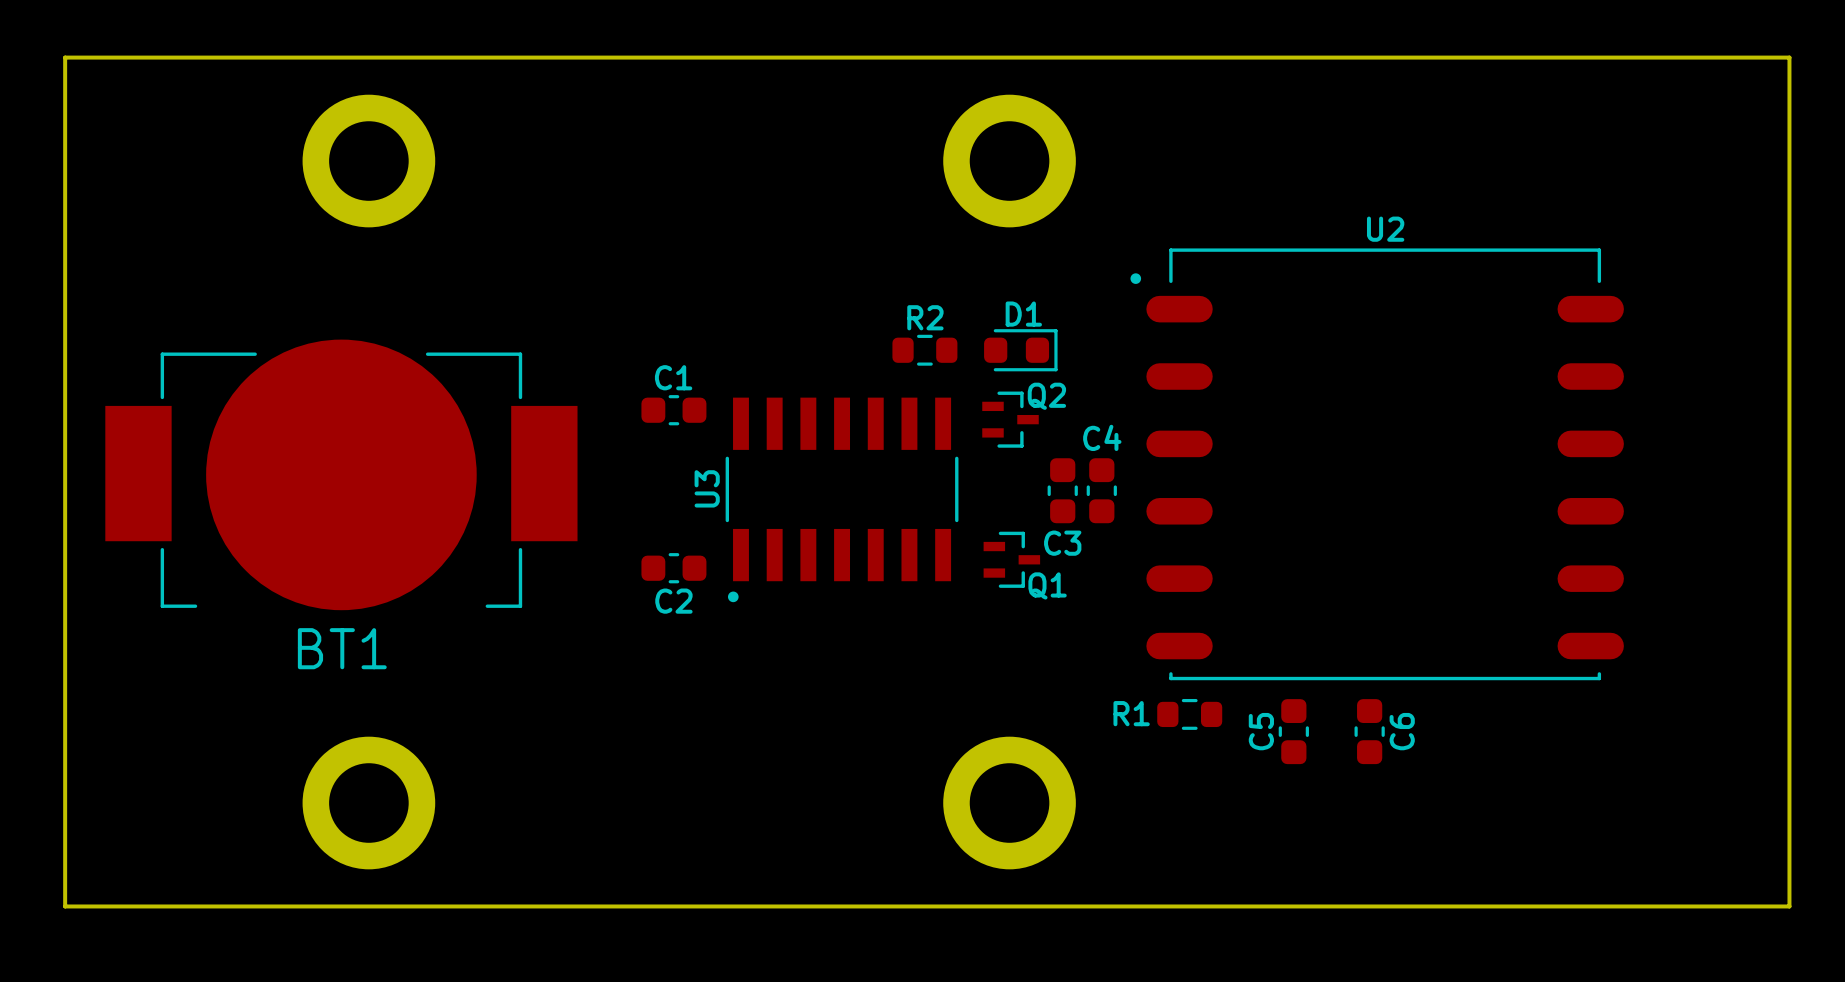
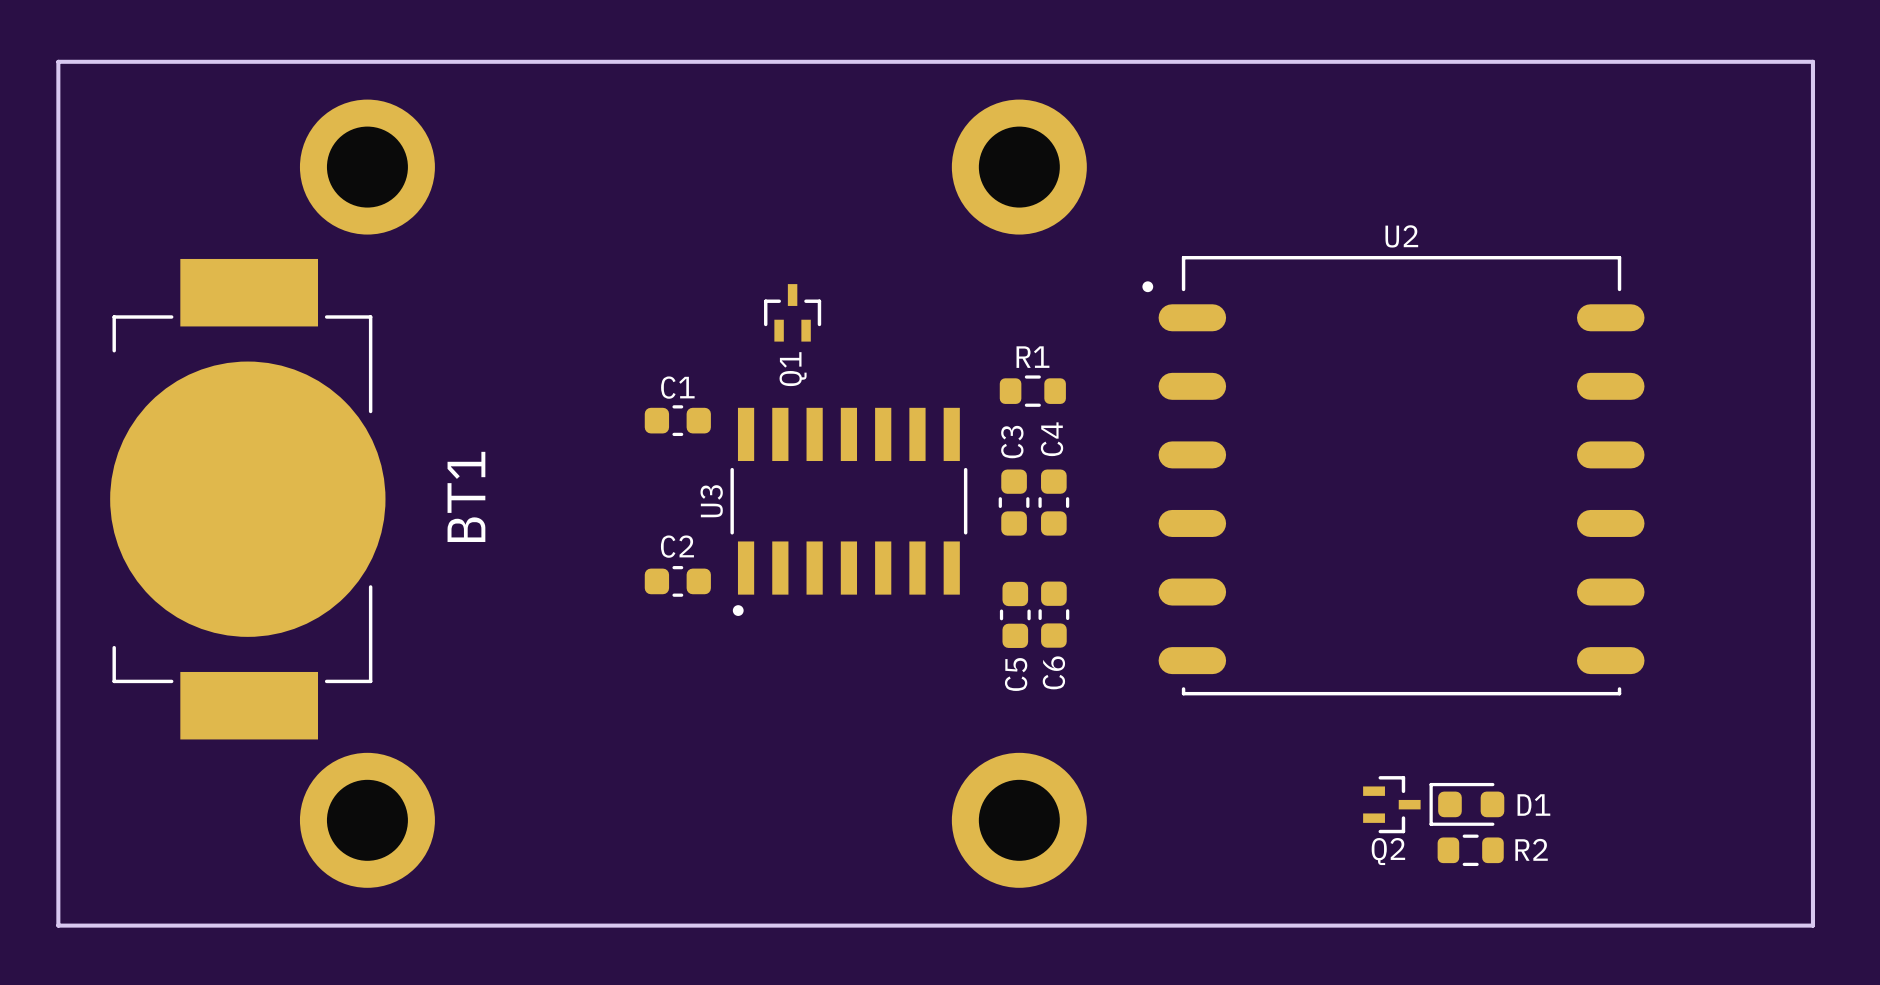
D1 name position: D1 (1023, 314) -> D1 (1533, 805)
R2 name position: R2 (925, 317) -> R2 (1531, 849)
R2 position: (924, 350) -> (1470, 850)
D1 rotation: 0° (1020, 350) -> 180° (1466, 804)
D1 position: (1020, 350) -> (1466, 804)
Q2 name position: Q2 (1046, 396) -> Q2 (1388, 851)
Q2 position: (1010, 419) -> (1391, 804)
C4 name rotation: 0° (1102, 437) -> 90° counterclockwise (1052, 439)
BT1 rotation: 0° (341, 474) -> 90° clockwise (247, 499)
C3 position: (1062, 490) -> (1014, 502)
C4 position: (1101, 490) -> (1053, 502)
C3 name rotation: 0° (1062, 543) -> 90° counterclockwise (1012, 442)
C3 name position: C3 (1062, 543) -> C3 (1012, 442)
Q1 rotation: 0° (1011, 559) -> 90° counterclockwise (792, 312)
Q1 position: (1011, 559) -> (792, 312)
C2 name position: C2 (673, 601) -> C2 (677, 546)
BT1 name position: BT1 (342, 648) -> BT1 (466, 496)
R1 name position: R1 (1131, 713) -> R1 (1032, 357)
R1 position: (1189, 714) -> (1032, 391)
C5 name position: C5 (1261, 731) -> C5 (1016, 674)
C5 position: (1293, 731) -> (1015, 614)
C6 position: (1369, 731) -> (1053, 614)
C6 name position: C6 (1402, 731) -> C6 (1053, 672)

